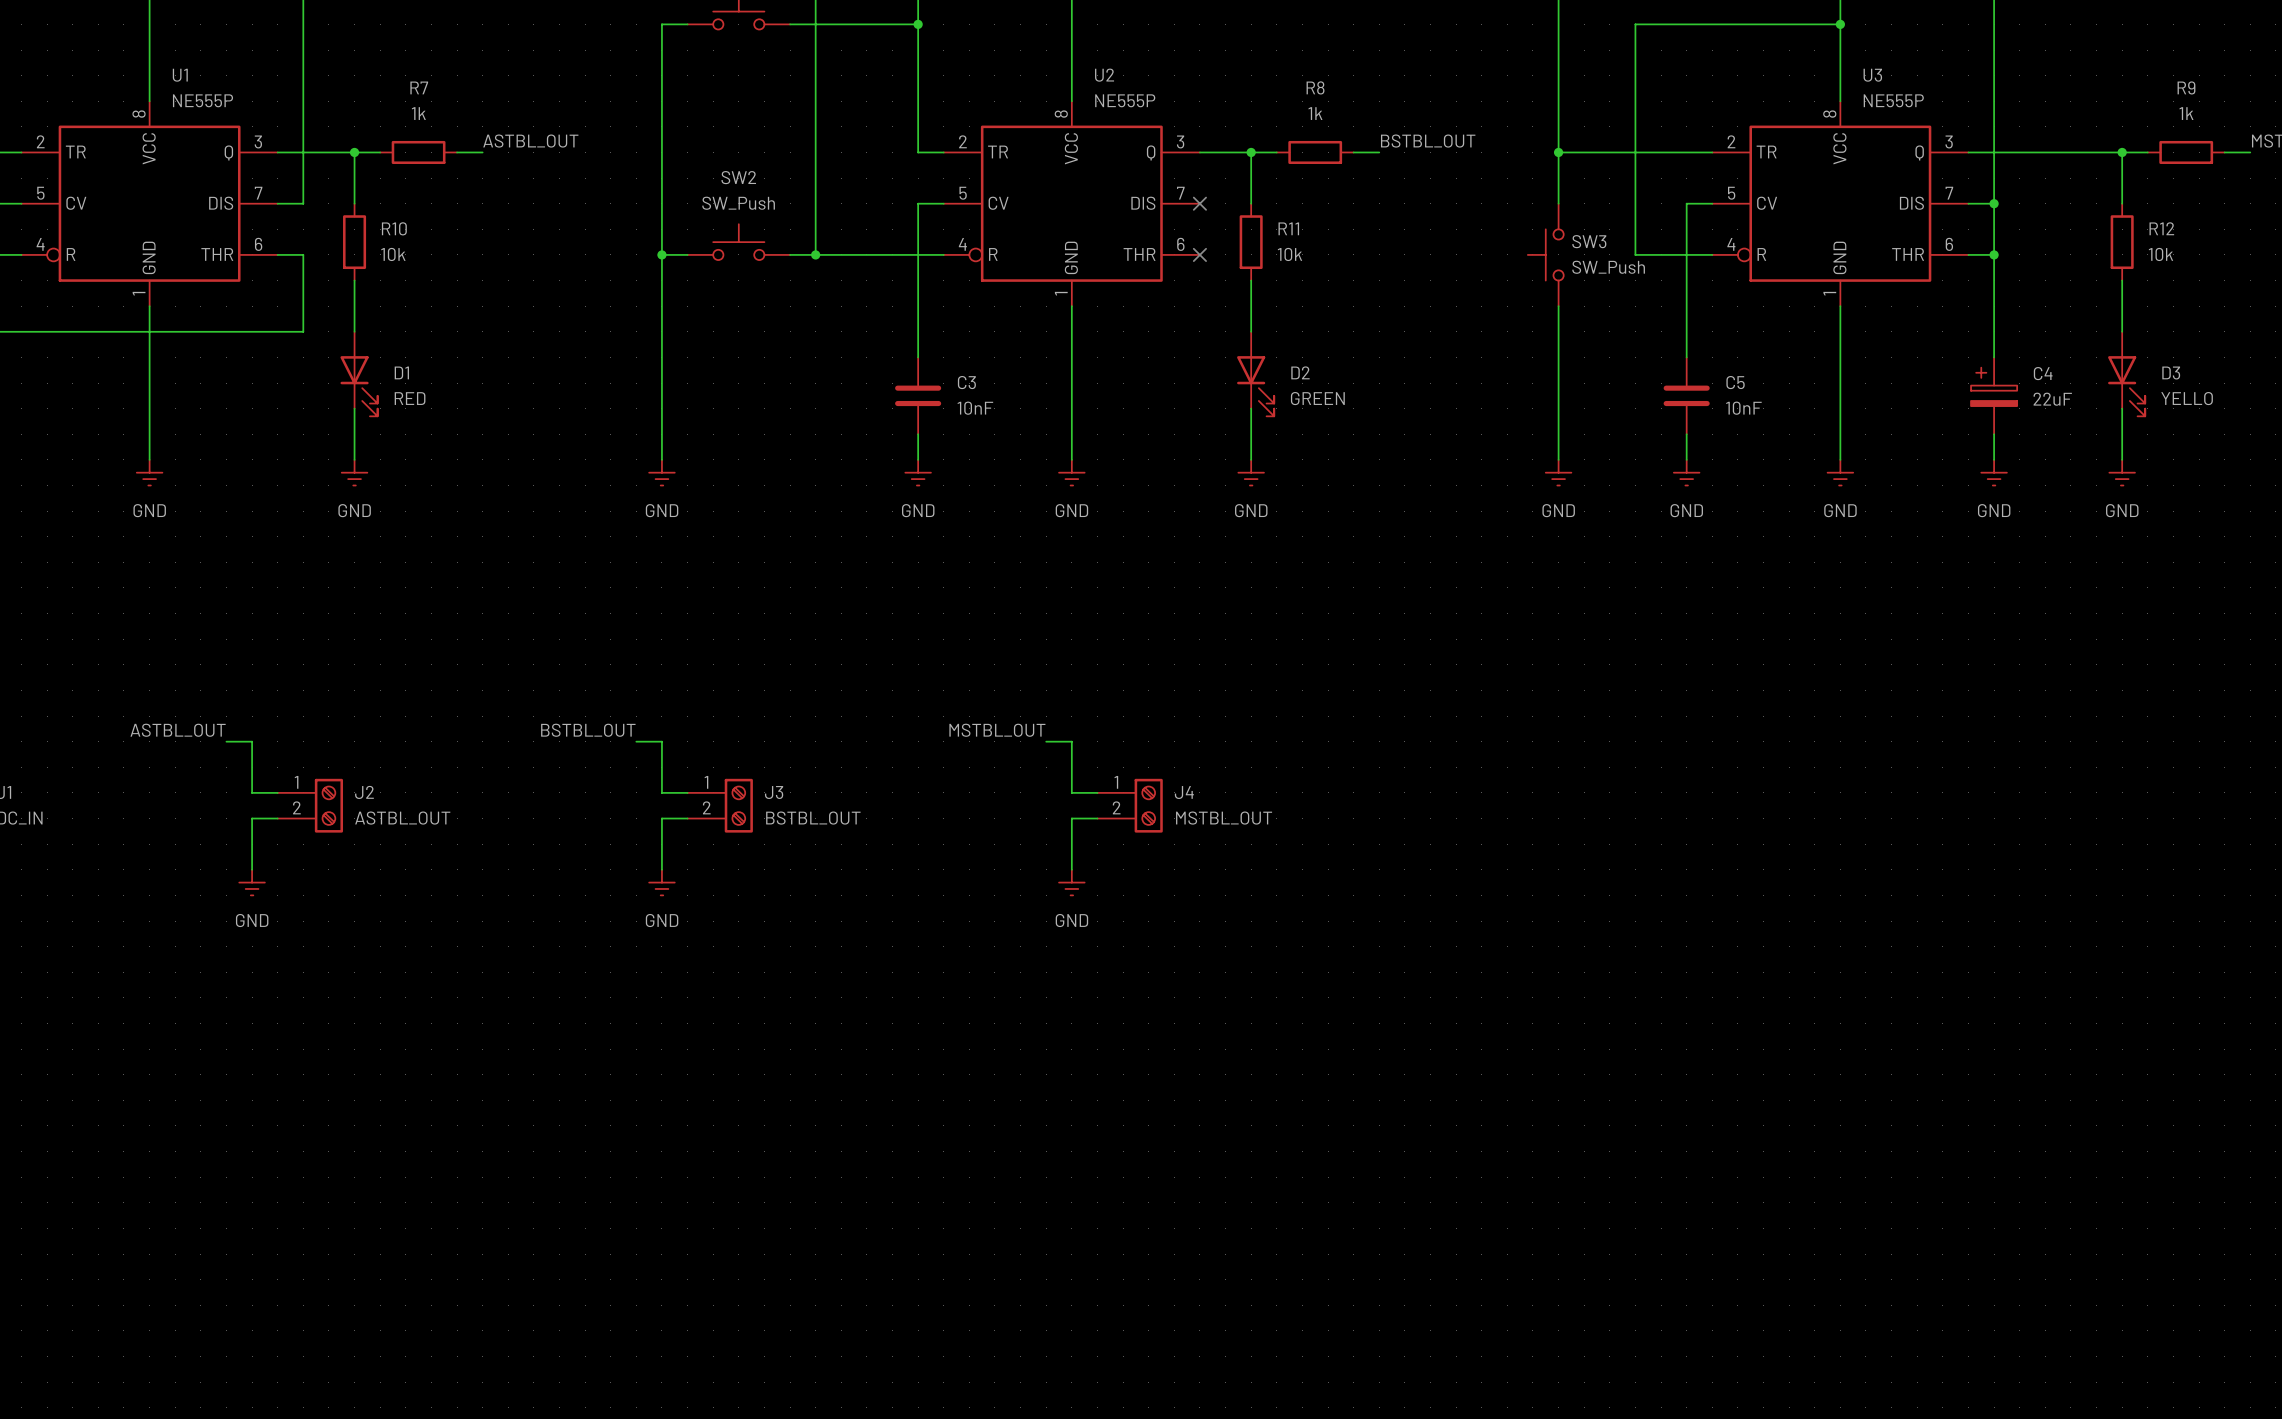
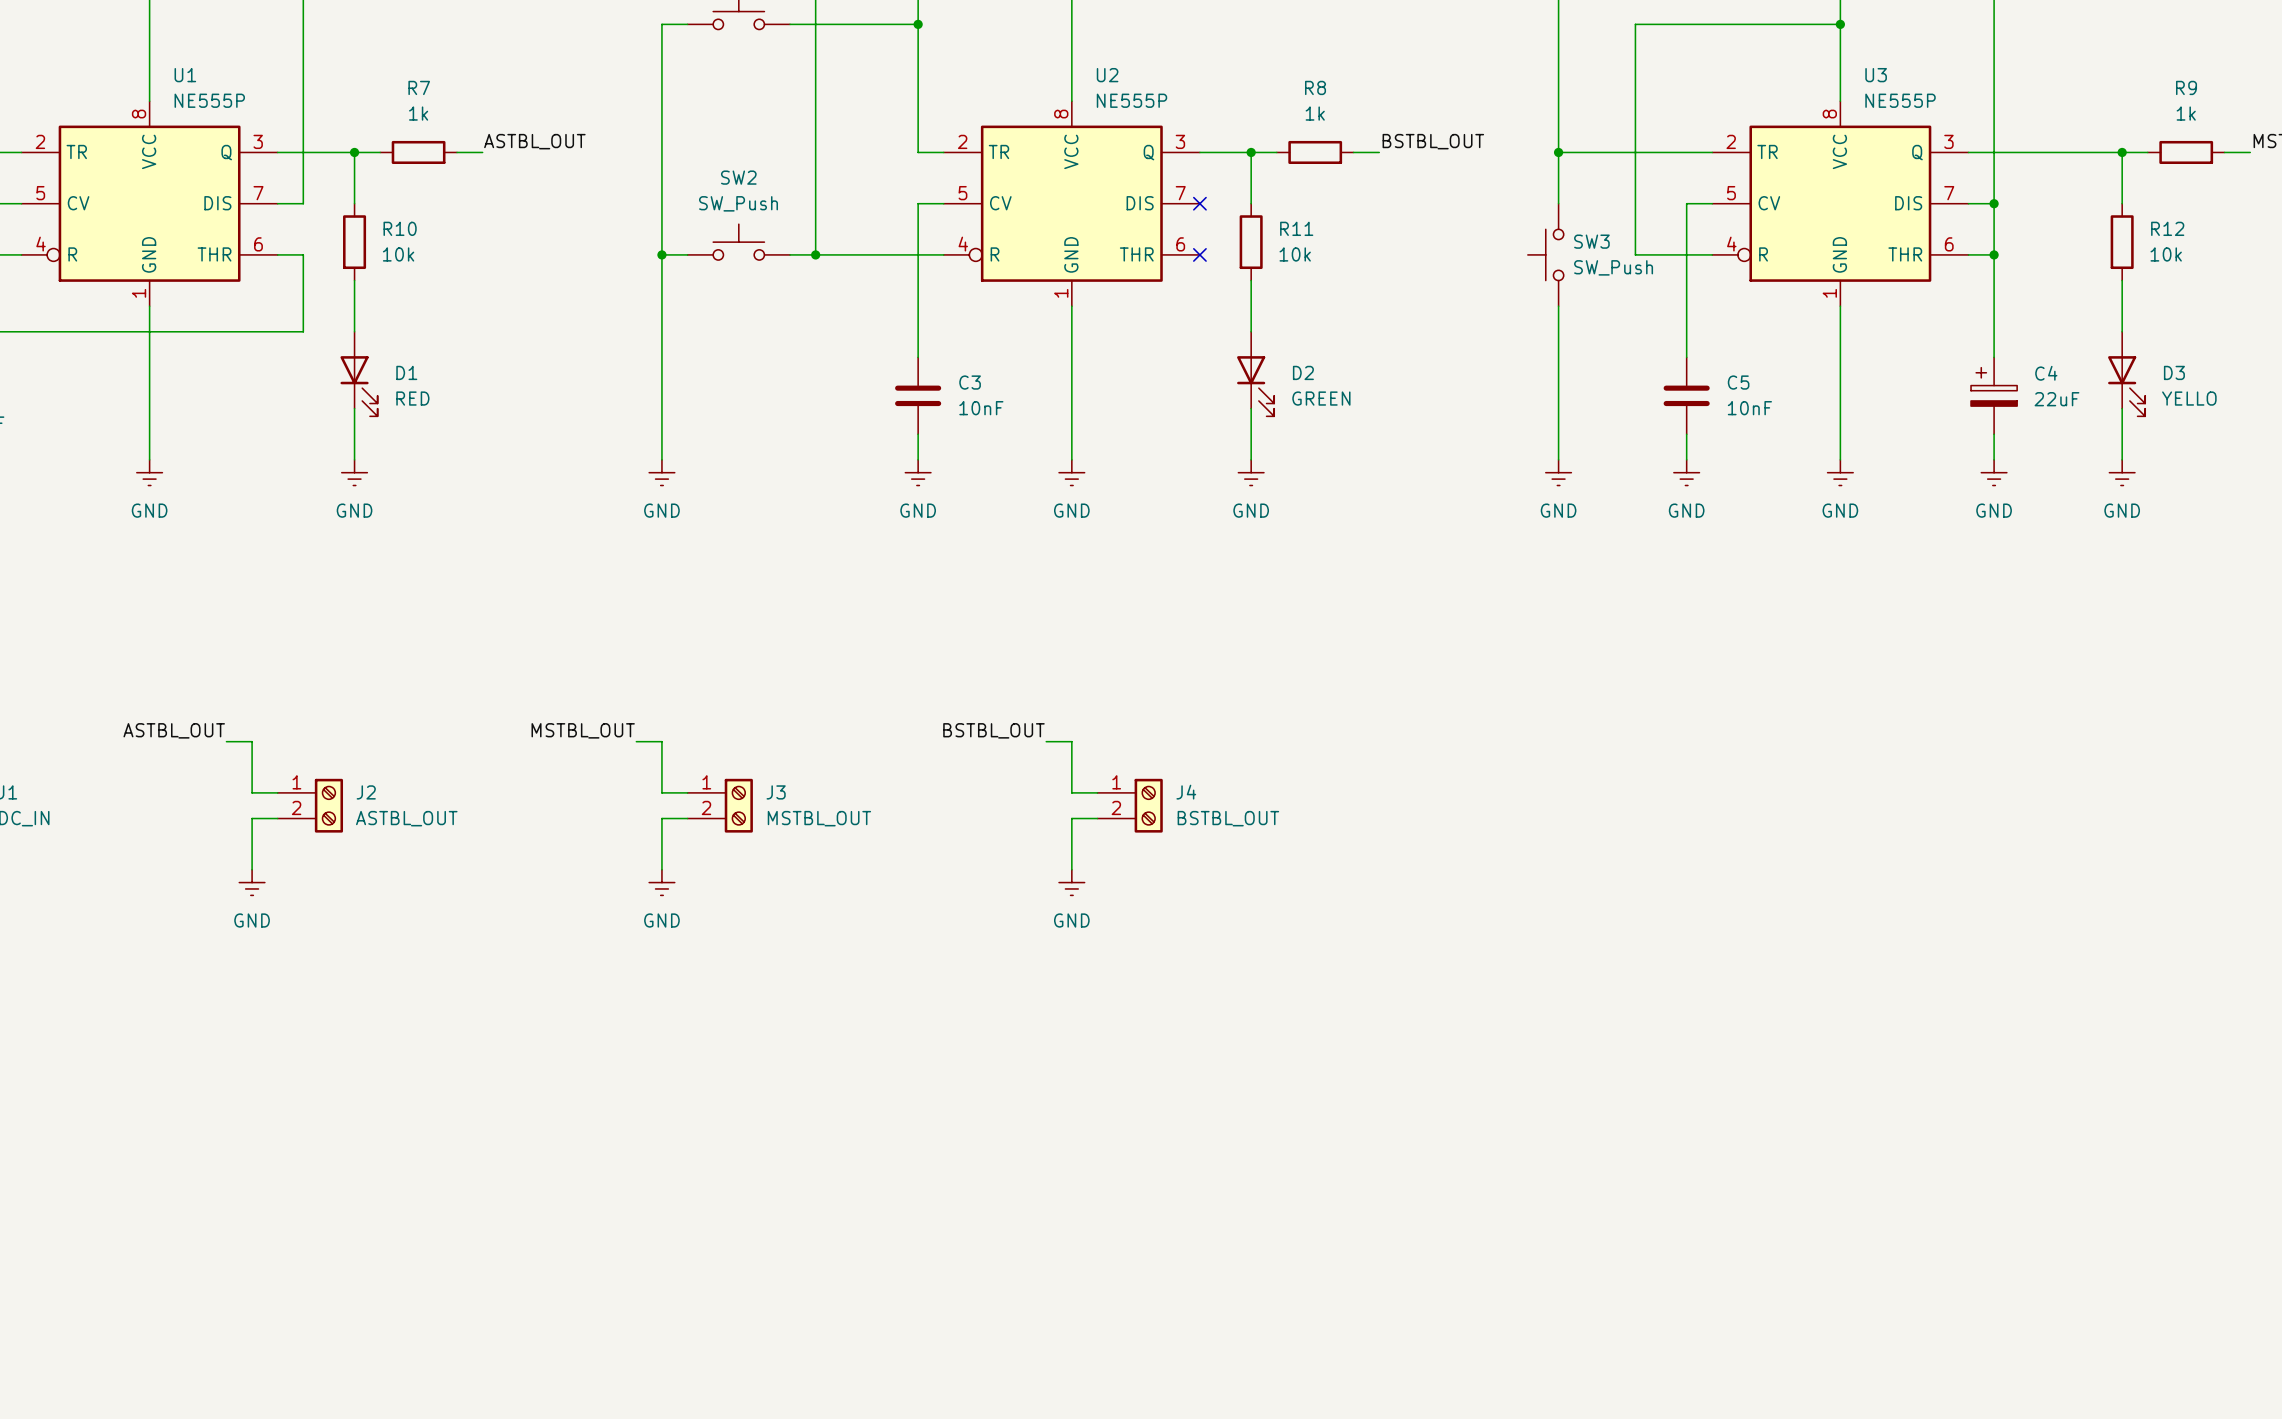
label: BSTBL_OUT (588, 730) -> MSTBL_OUT (583, 730)
label: MSTBL_OUT (997, 730) -> BSTBL_OUT (993, 730)
J3 value: BSTBL_OUT (813, 818) -> MSTBL_OUT (819, 818)
J4 value: MSTBL_OUT (1224, 818) -> BSTBL_OUT (1228, 818)

